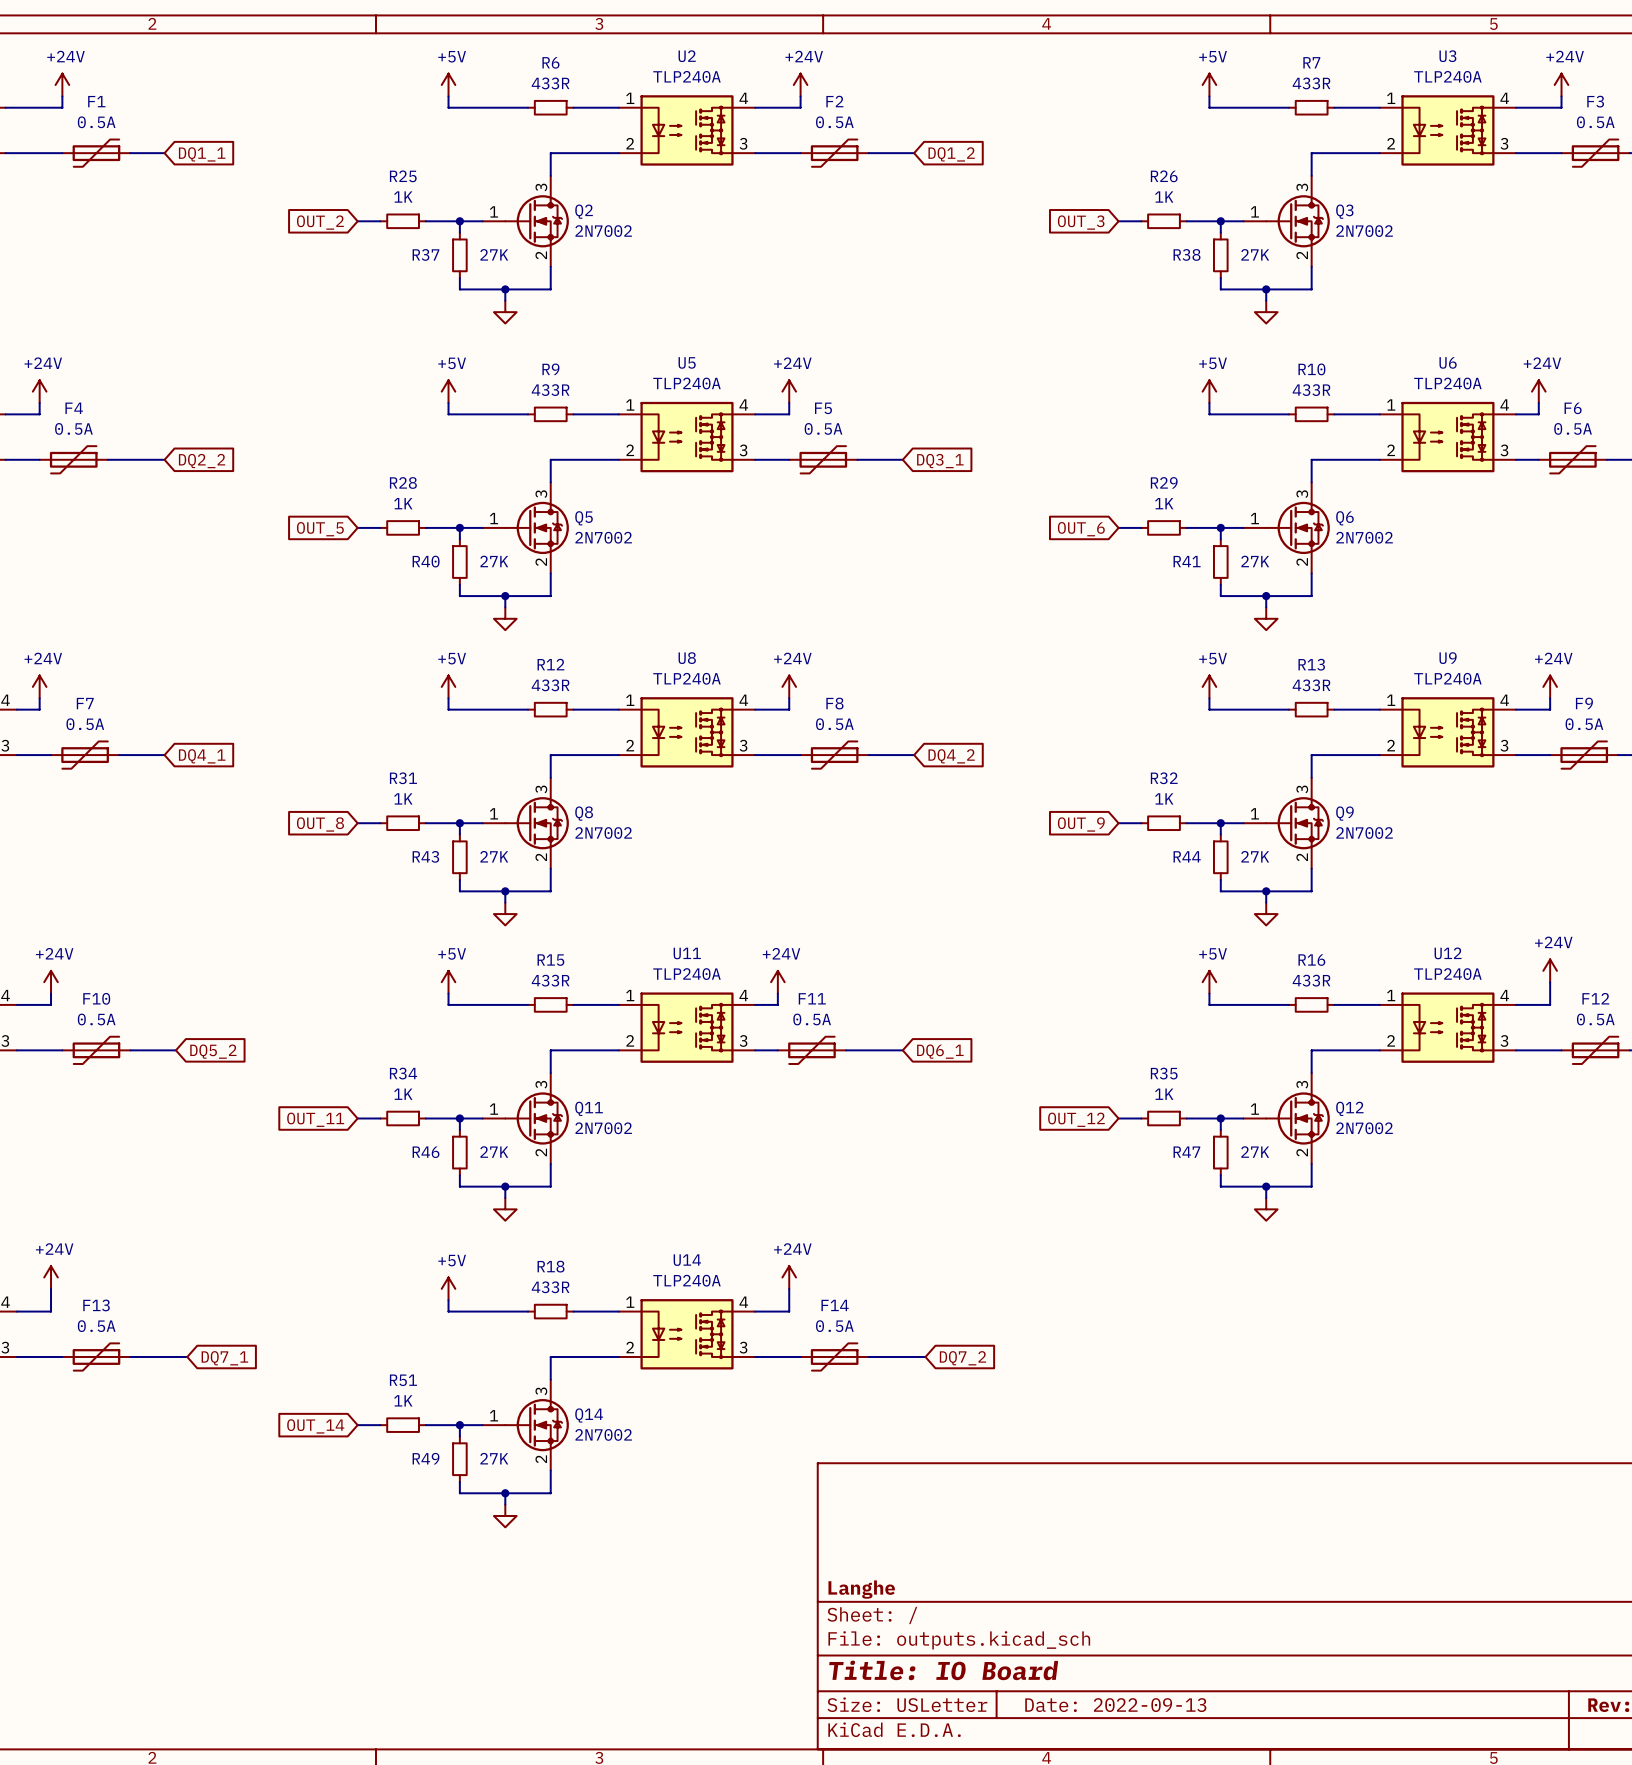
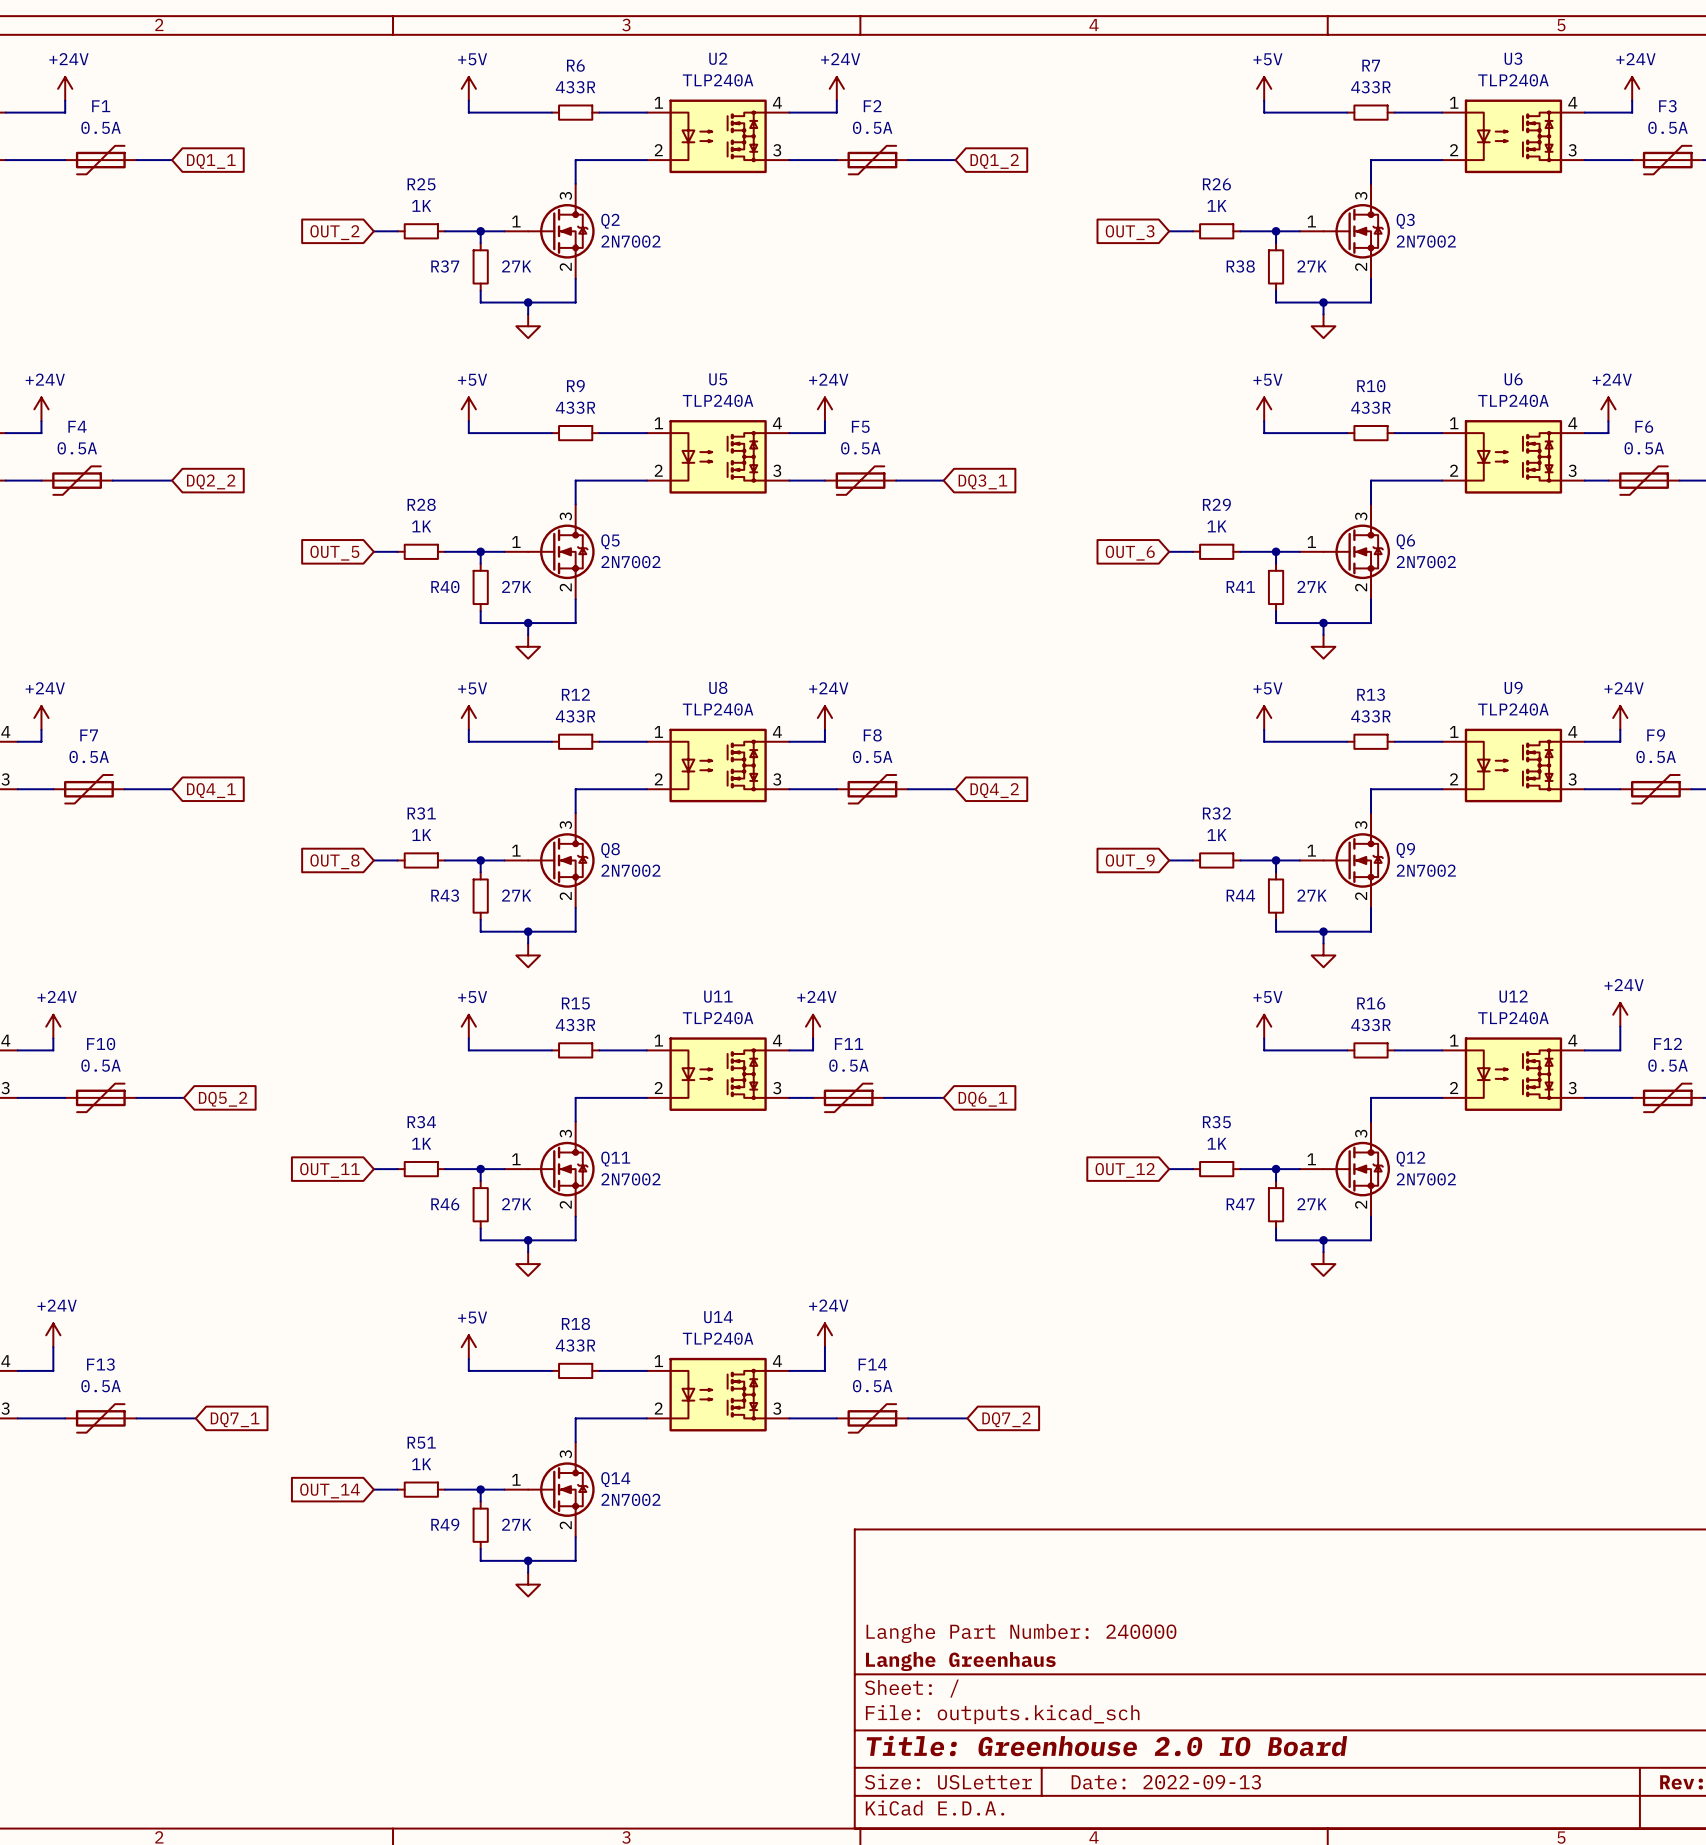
title block: none -> Langhe Part Number: 240000 (1021, 1633)
title block: Langhe (861, 1589) -> Langhe Greenhaus (960, 1661)
title block: Title: IO Board (943, 1670) -> Title: Greenhouse 2.0 IO Board (1106, 1745)

